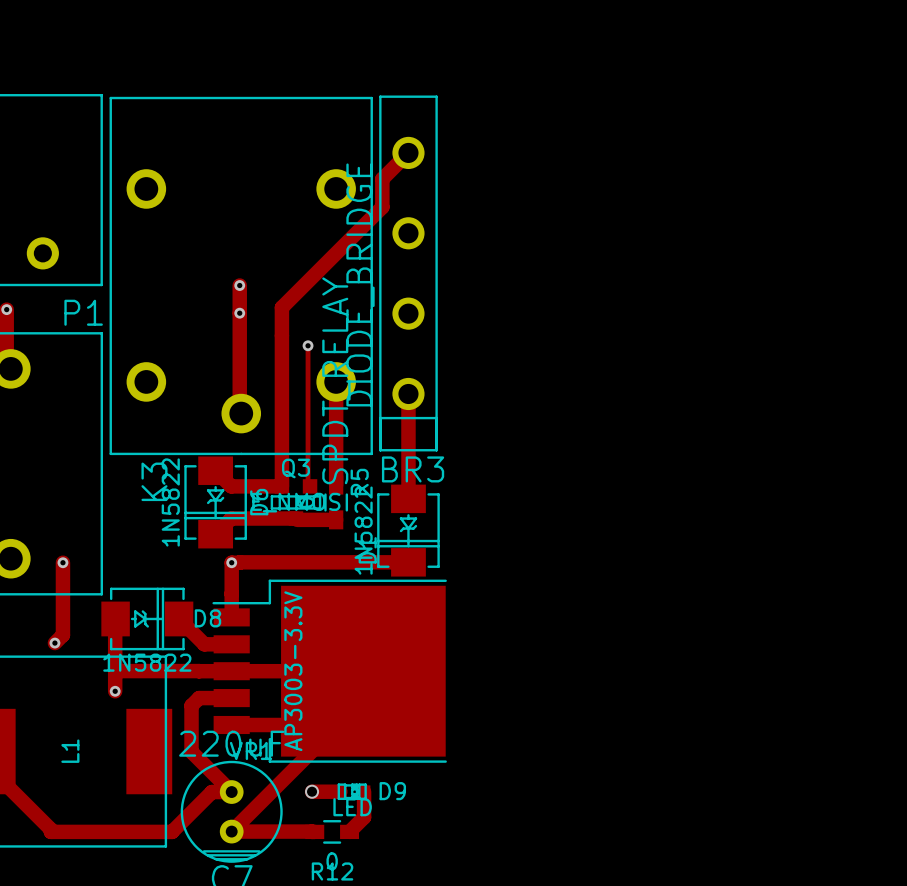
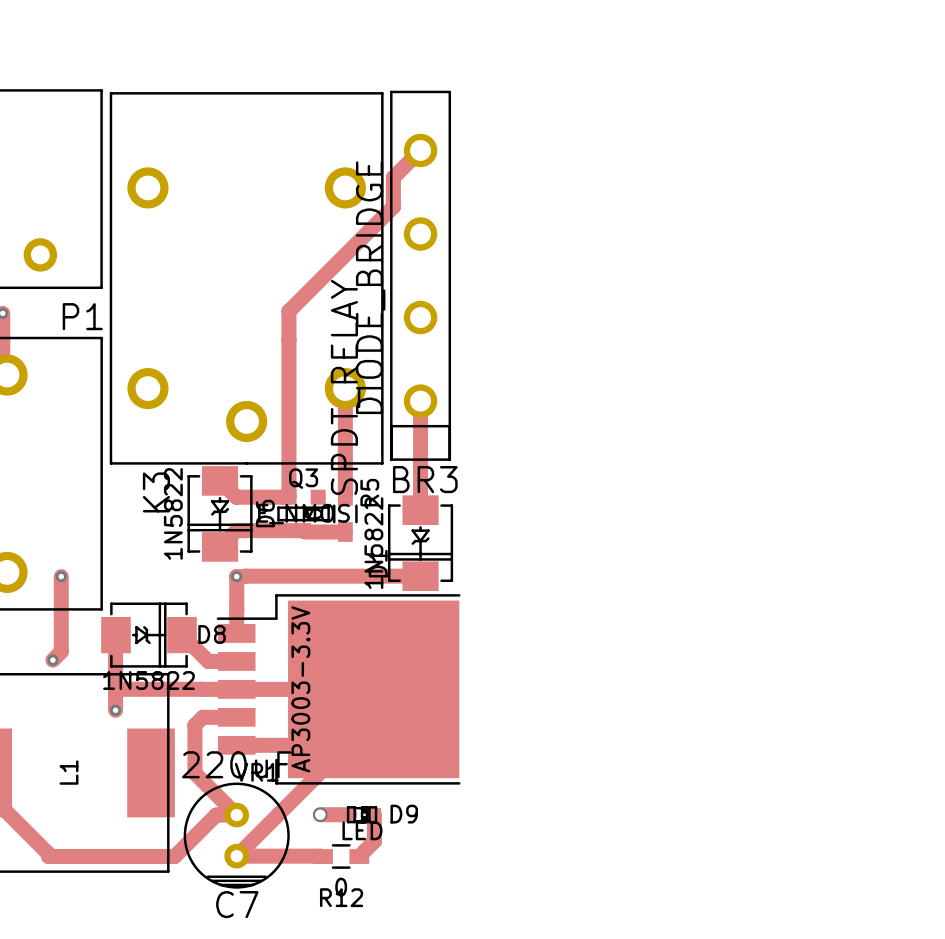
track: (239, 285) (239, 412) (241, 413) -> none
via: (239, 285) -> none
via: (239, 313) -> none
track: (308, 345) (308, 484) (310, 486) -> none
via: (308, 345) -> none

